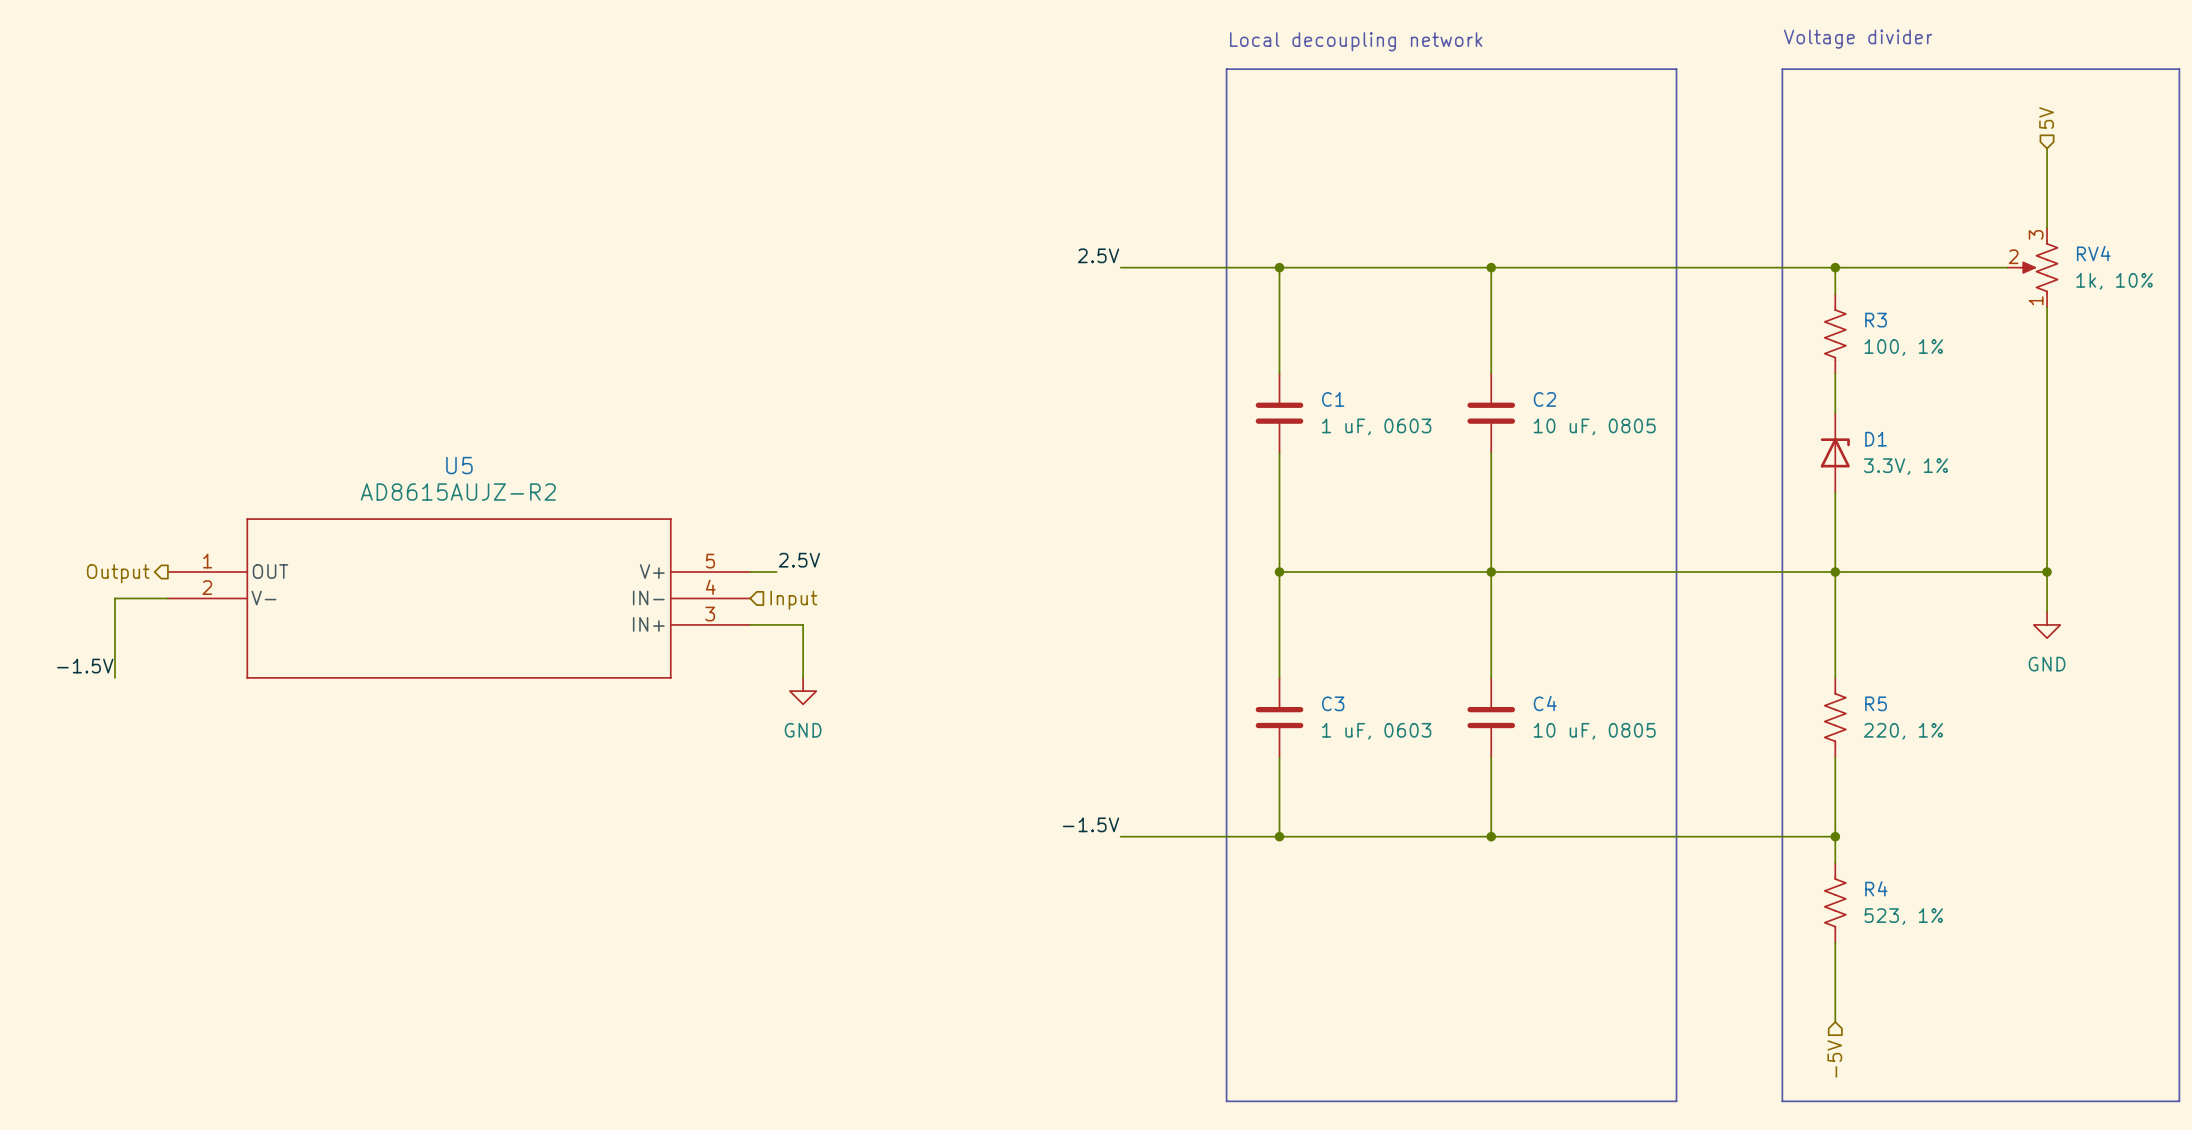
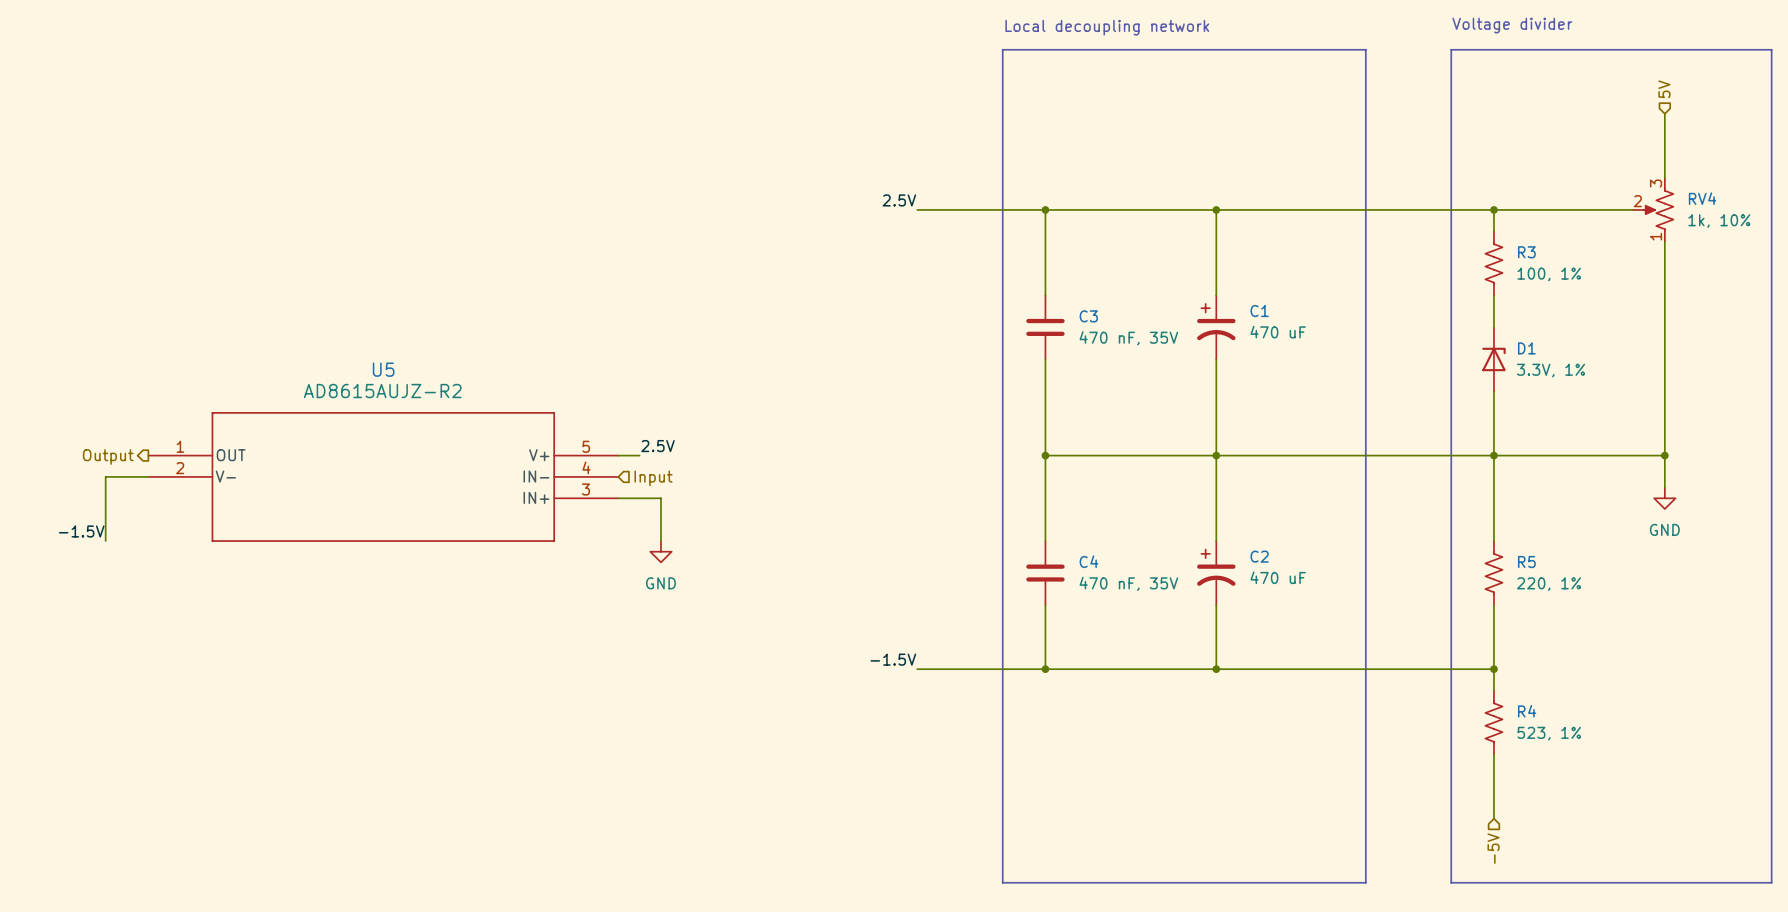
C2 symbol: [1467, 373, 1516, 453] -> [1197, 541, 1236, 606]
C1 name: C1 (1333, 399) -> C3 (1088, 316)
C1: none -> 470 uF (1216, 327)
C1 value: 1 uF, 0603 (1376, 426) -> 470 nF, 35V (1128, 338)
C2 value: 10 uF, 0805 (1594, 426) -> 470 uF (1278, 577)
C3 name: C3 (1333, 703) -> C4 (1089, 561)
C4: 10 uF, 0805 (1491, 717) -> none
C3 value: 1 uF, 0603 (1376, 731) -> 470 nF, 35V (1128, 583)

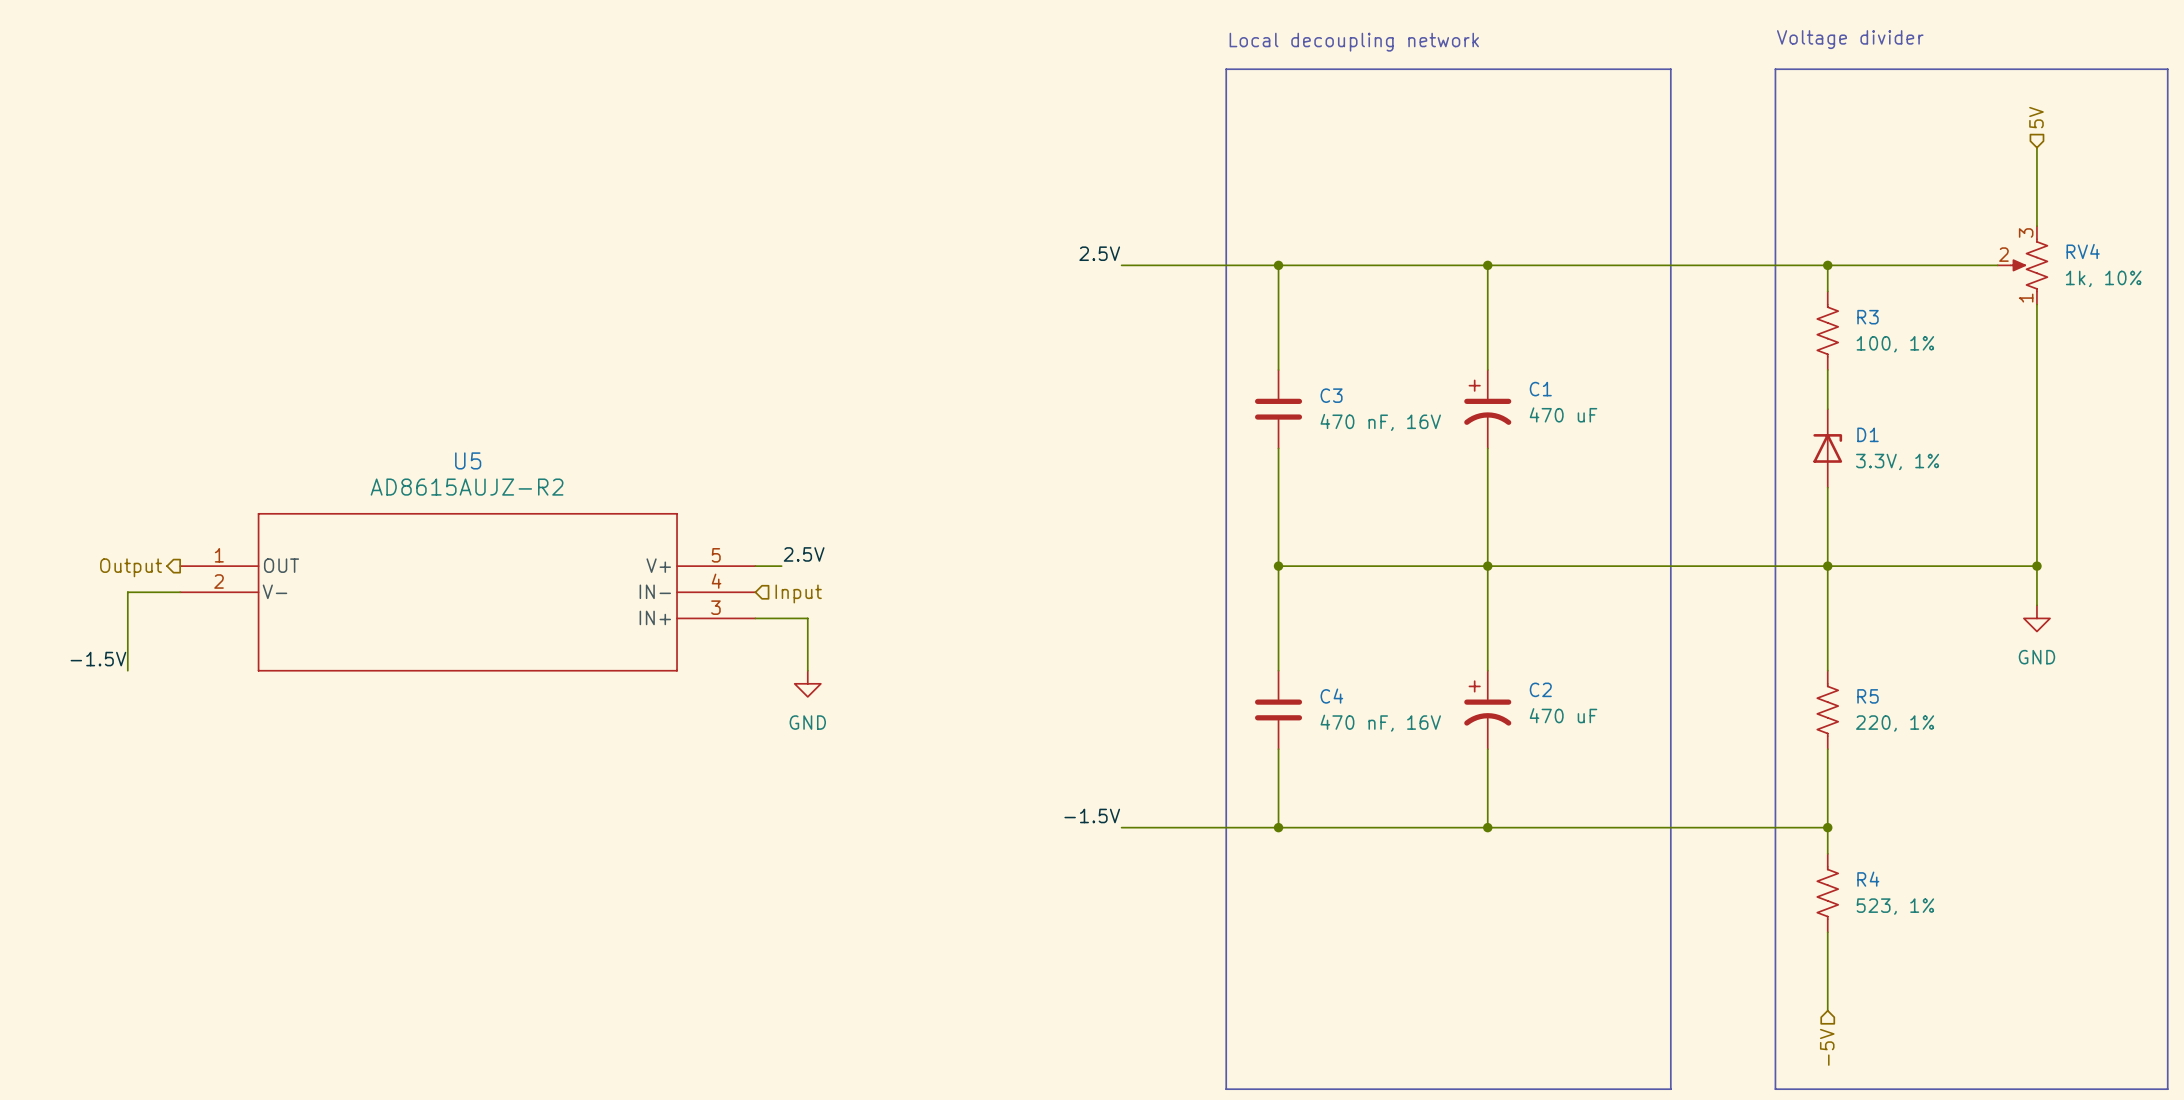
C3 value: 470 nF, 35V (1128, 338) -> 470 nF, 16V (1380, 422)
C4 value: 470 nF, 35V (1128, 583) -> 470 nF, 16V (1380, 723)

